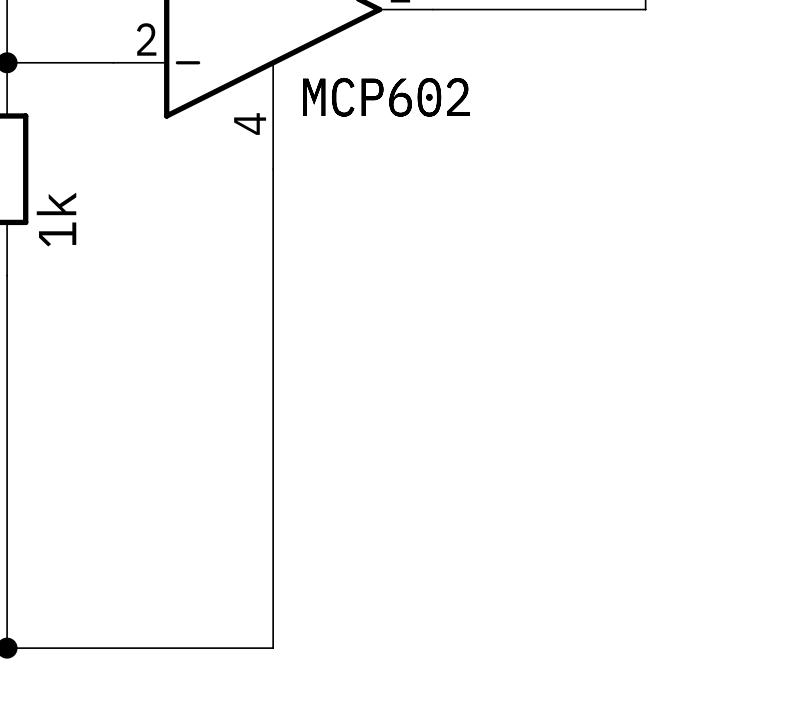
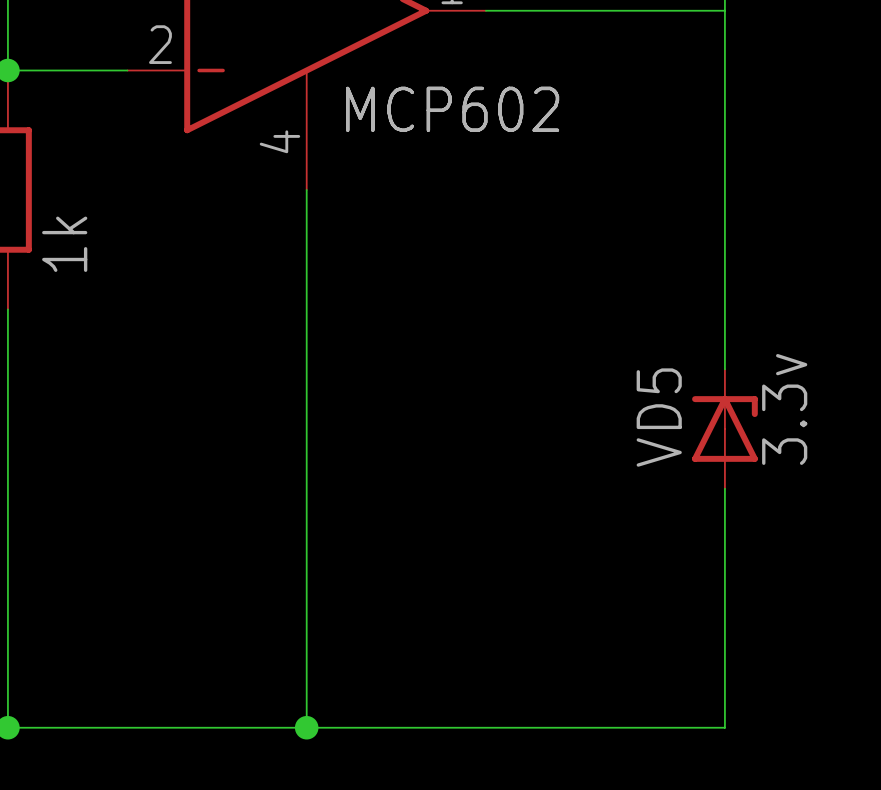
wire: none -> (724, 10) (724, 369)
VD5: none -> 3.3v (724, 428)
wire: none -> (724, 488) (724, 727) (306, 727)
junction: none -> (306, 727)

